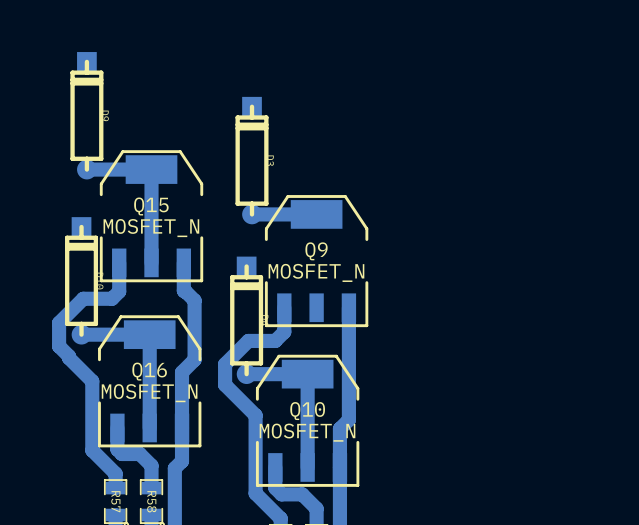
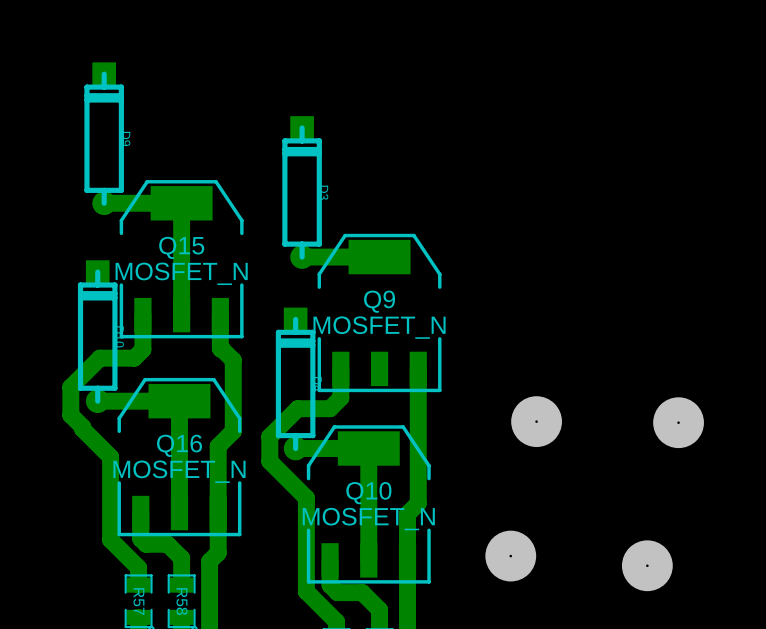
via: none -> (536, 421)
via: none -> (678, 422)
via: none -> (510, 556)
via: none -> (647, 565)

